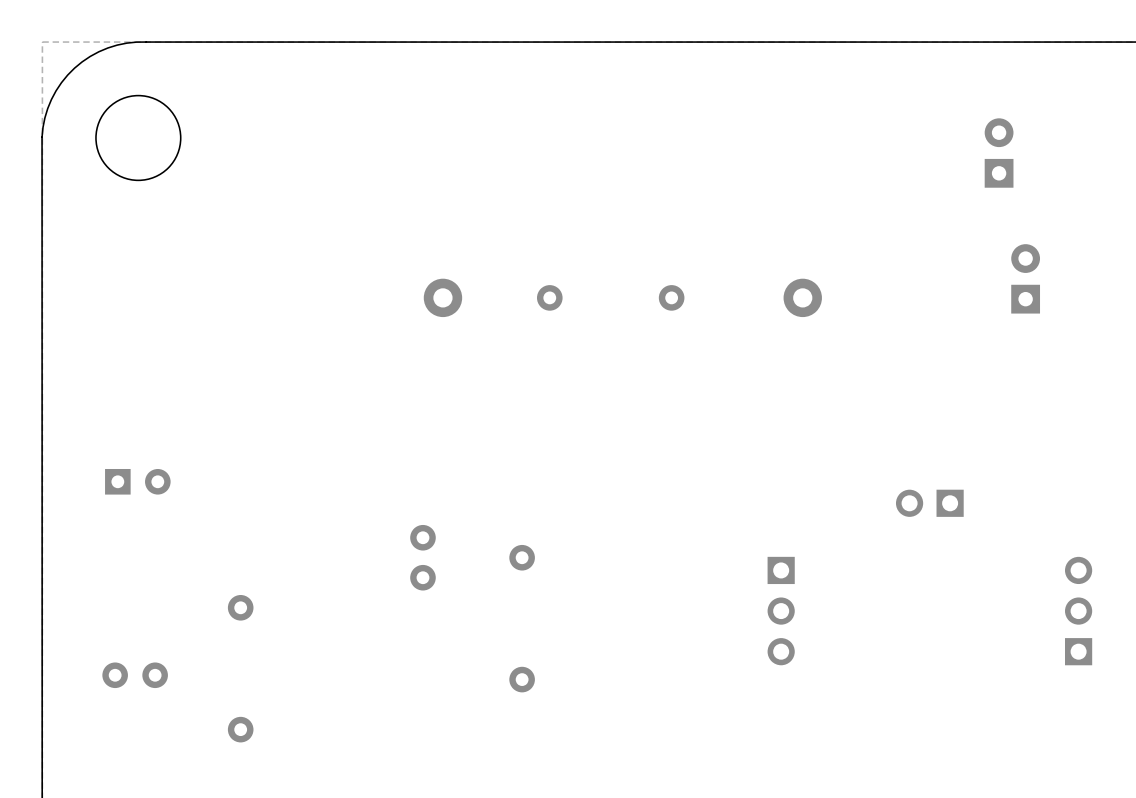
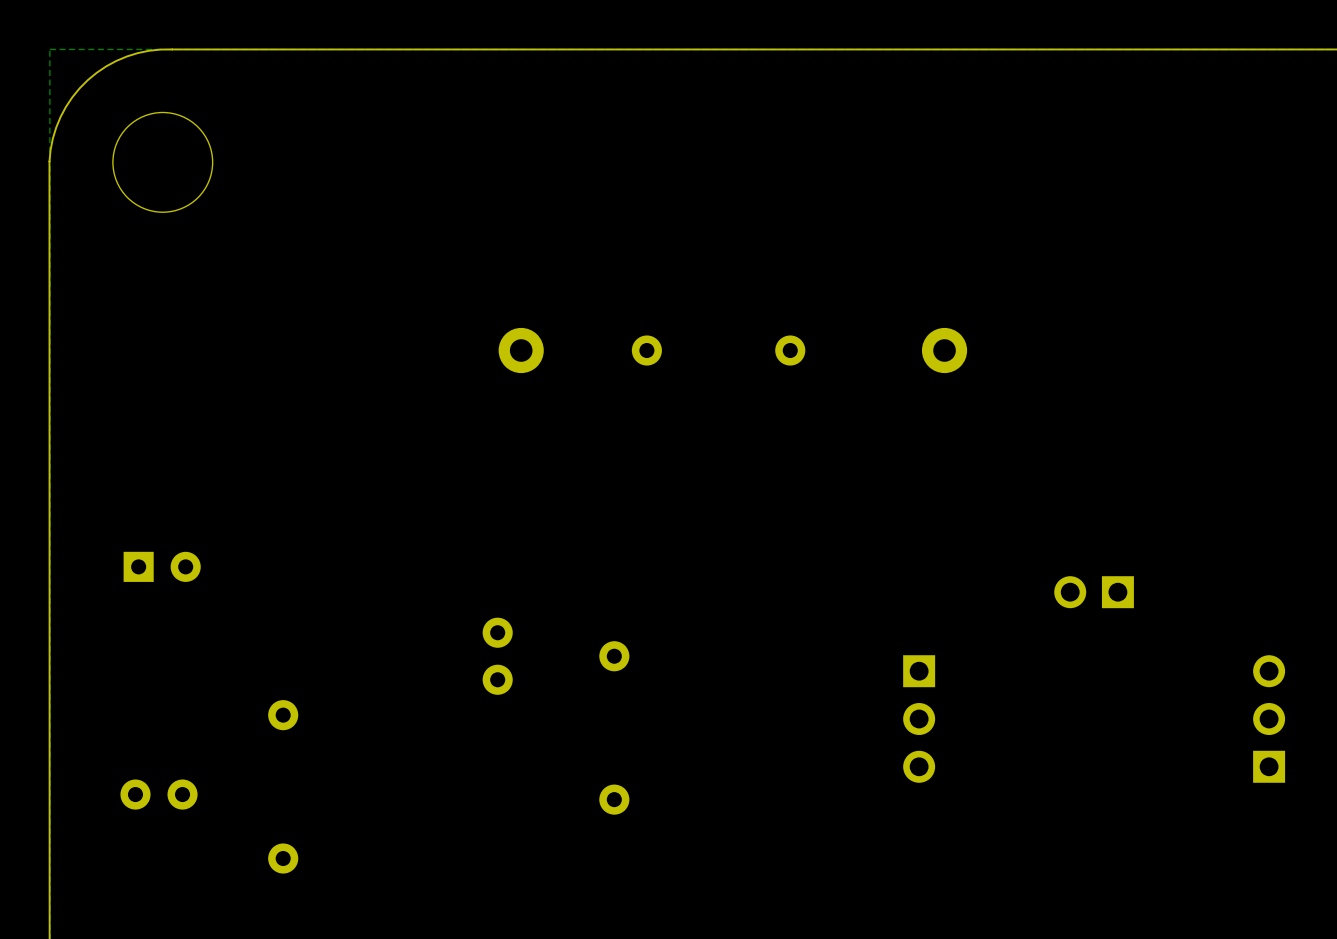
part: (999, 153) -> none
part: (1025, 278) -> none

